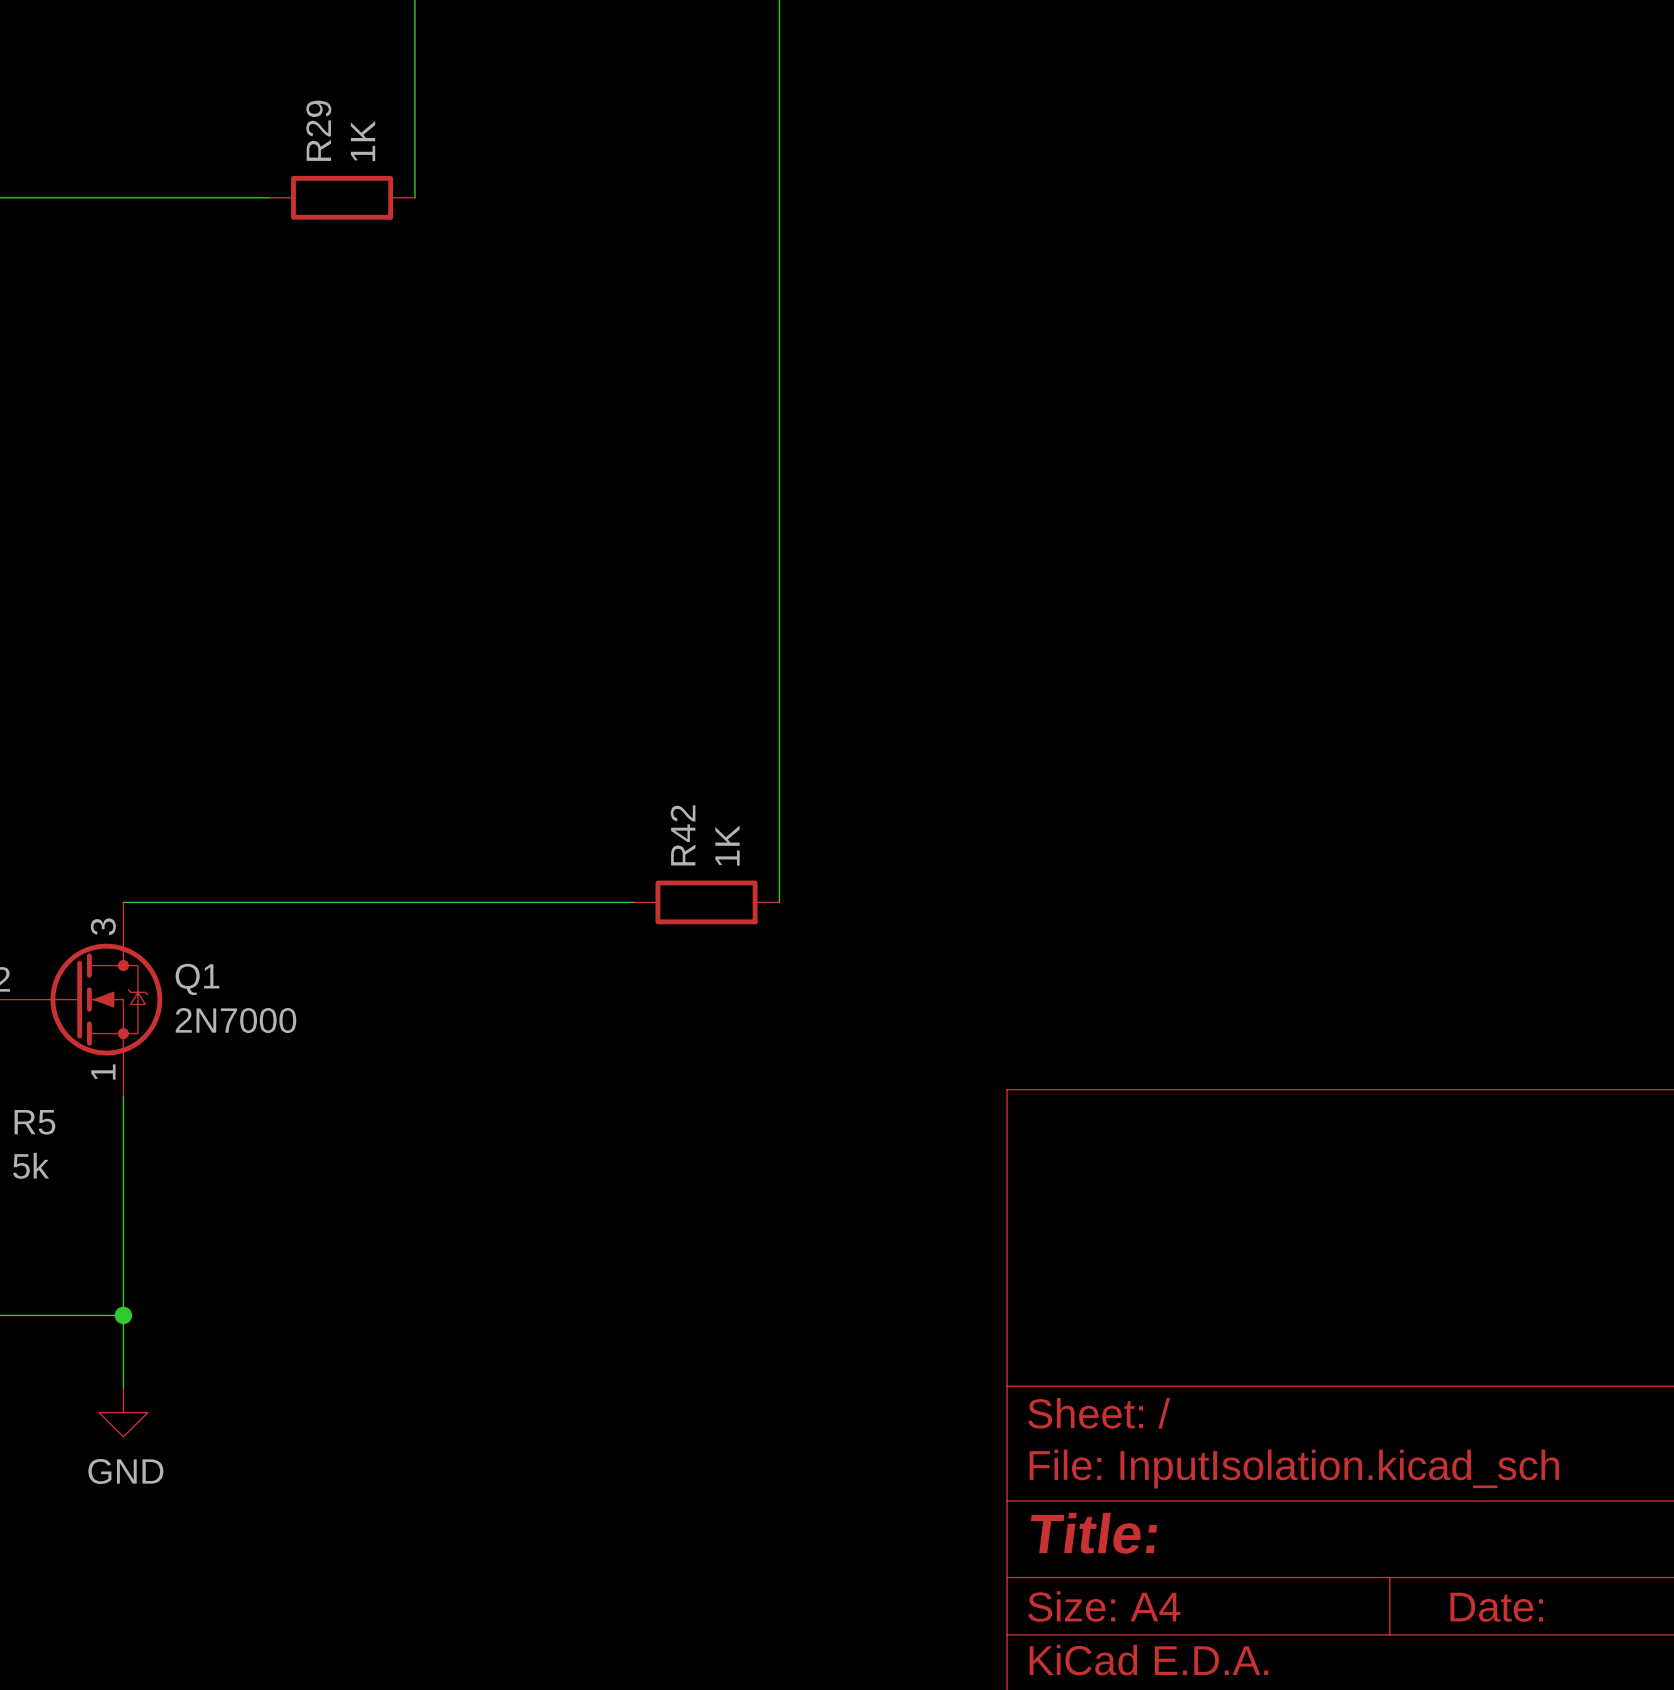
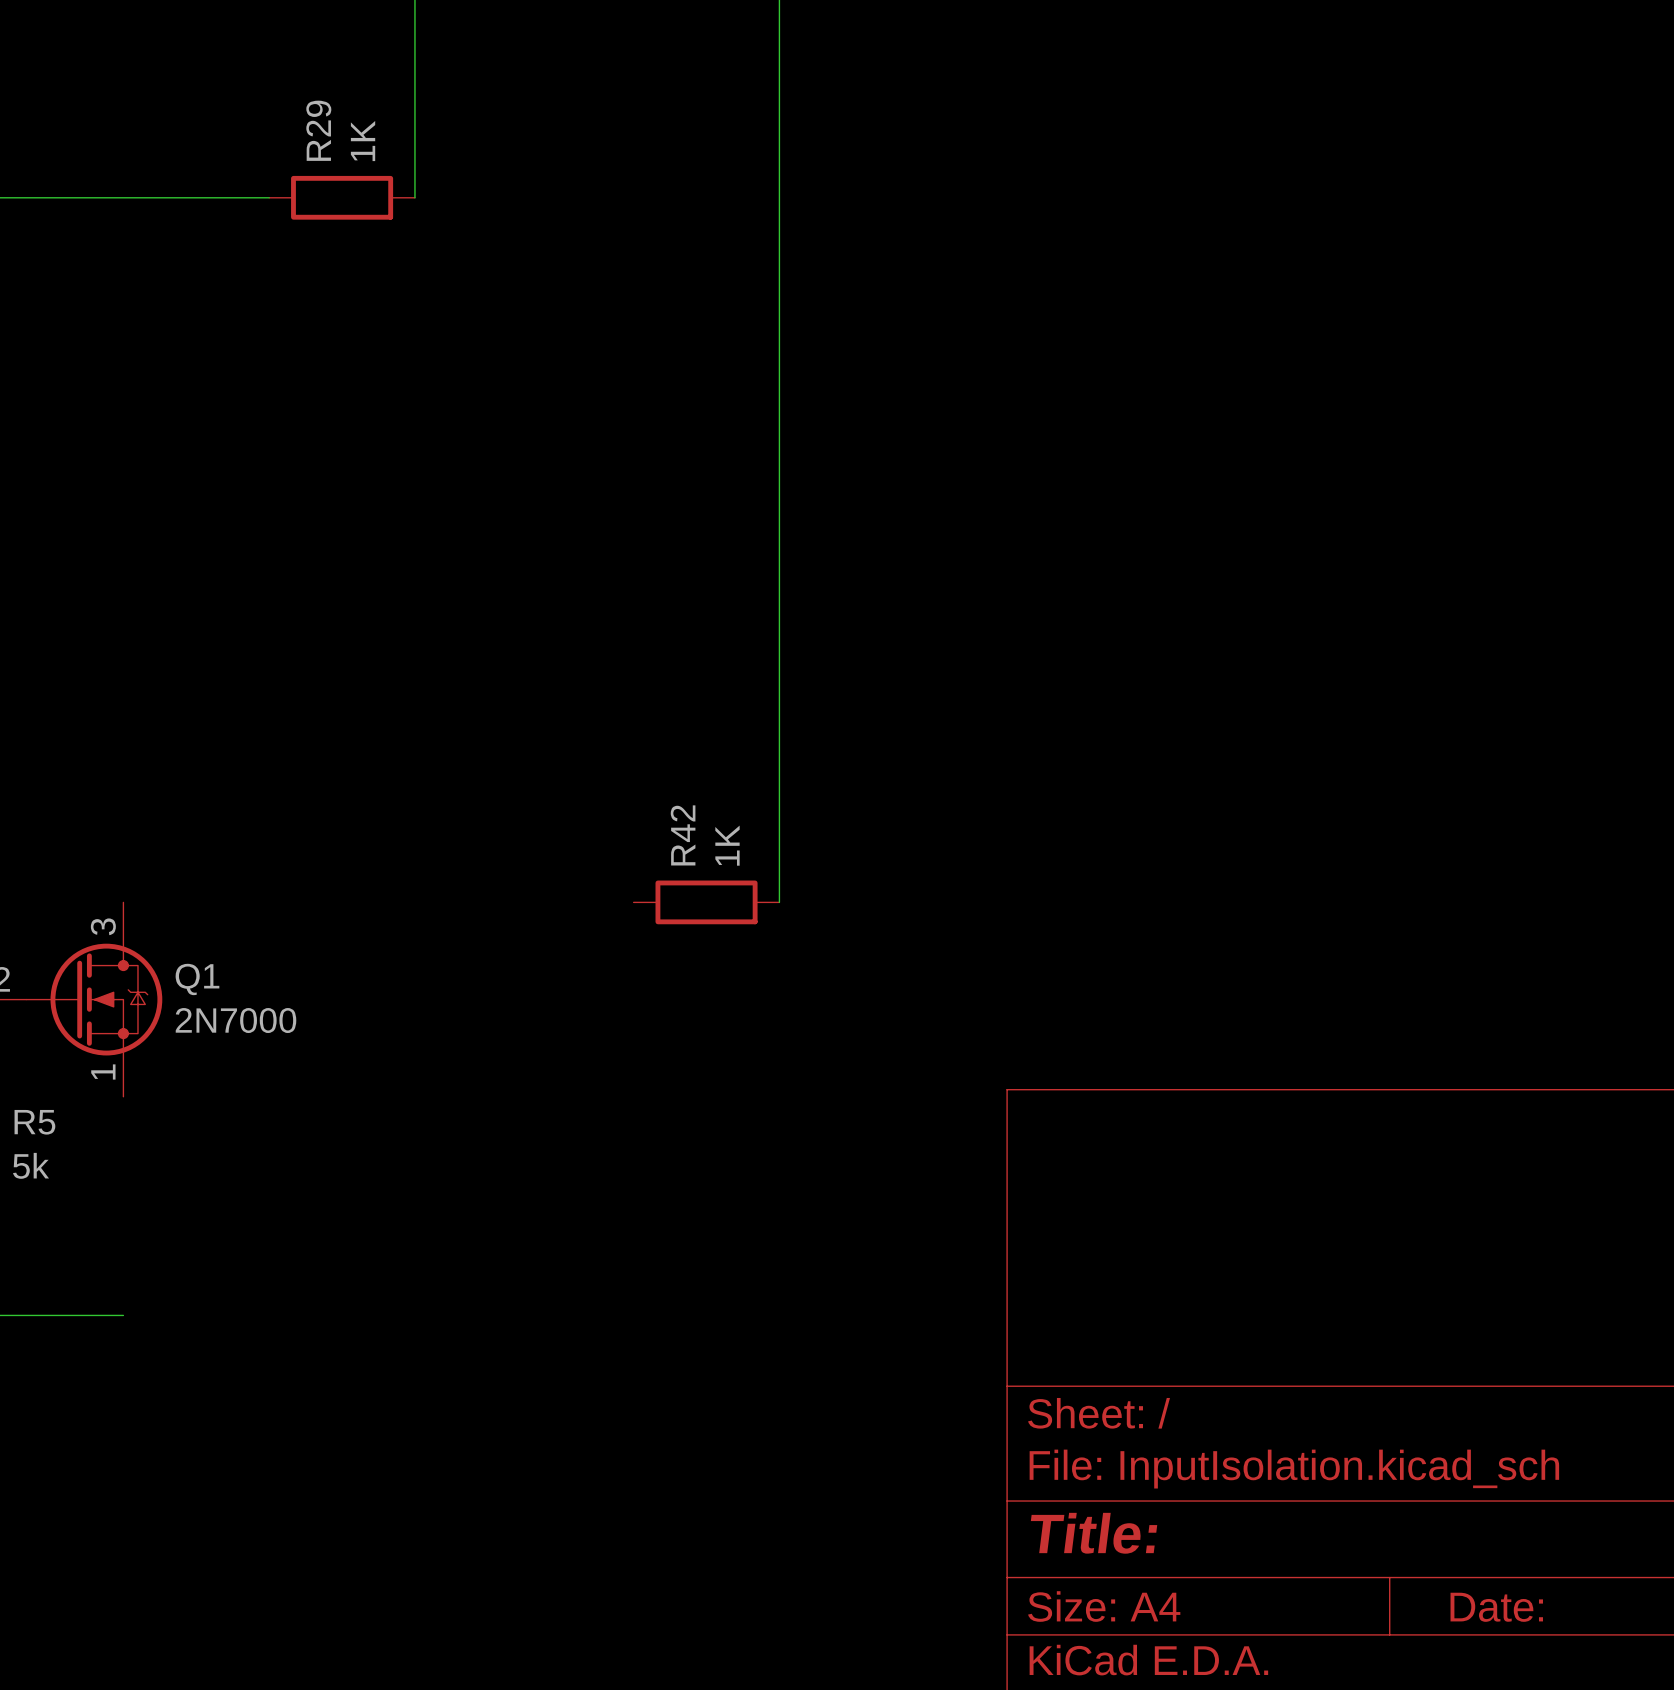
wire: (123, 902) (633, 902) -> none
wire: (123, 1096) (123, 1388) -> none
junction: (123, 1315) -> none
power symbol: GND (123, 1412) -> none

